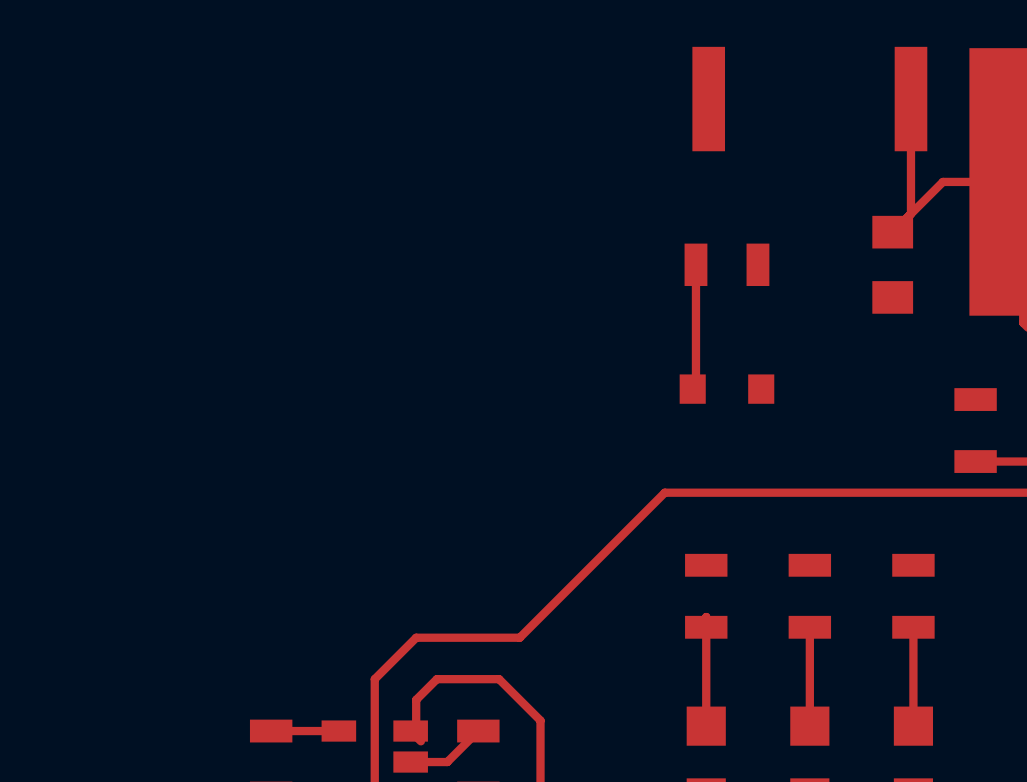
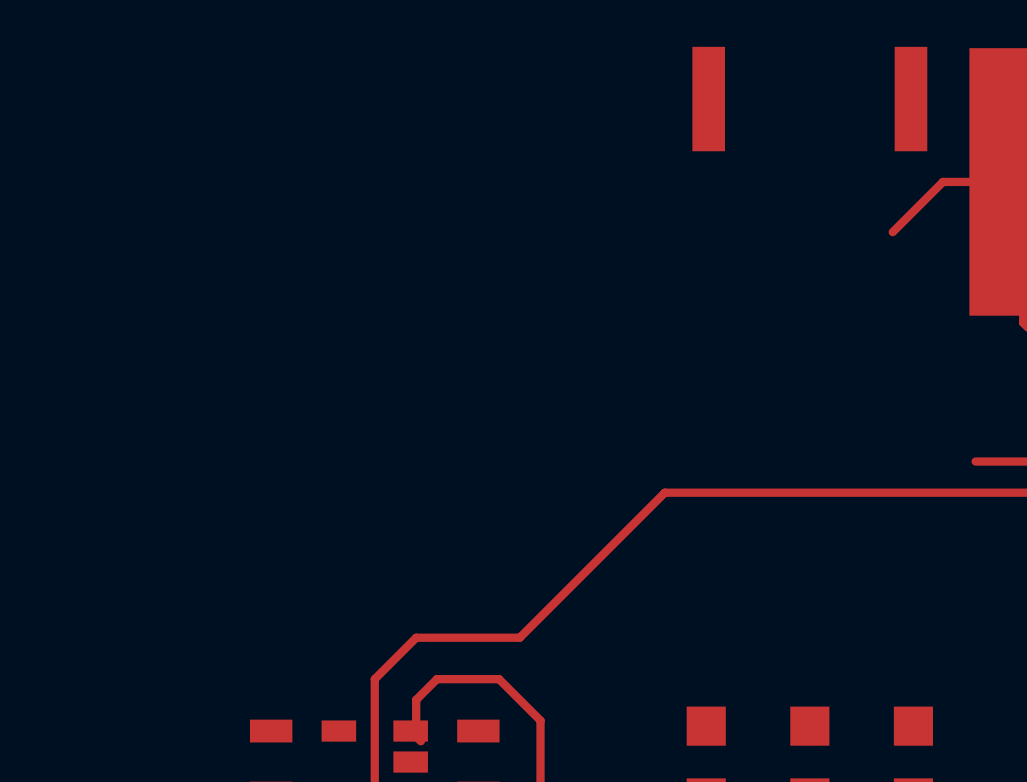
top track: (910, 99) (910, 213) -> none
top track: (695, 264) (695, 385) (692, 389) -> none
part: (726, 264) -> none
part: (892, 264) -> none
part: (726, 389) -> none
part: (975, 430) -> none
part: (706, 596) -> none
part: (809, 596) -> none
part: (913, 596) -> none
top track: (706, 617) (706, 726) -> none
top track: (809, 627) (809, 726) -> none
top track: (913, 627) (913, 726) -> none
top track: (338, 731) (271, 731) -> none
top track: (478, 731) (447, 762) (410, 762) -> none

